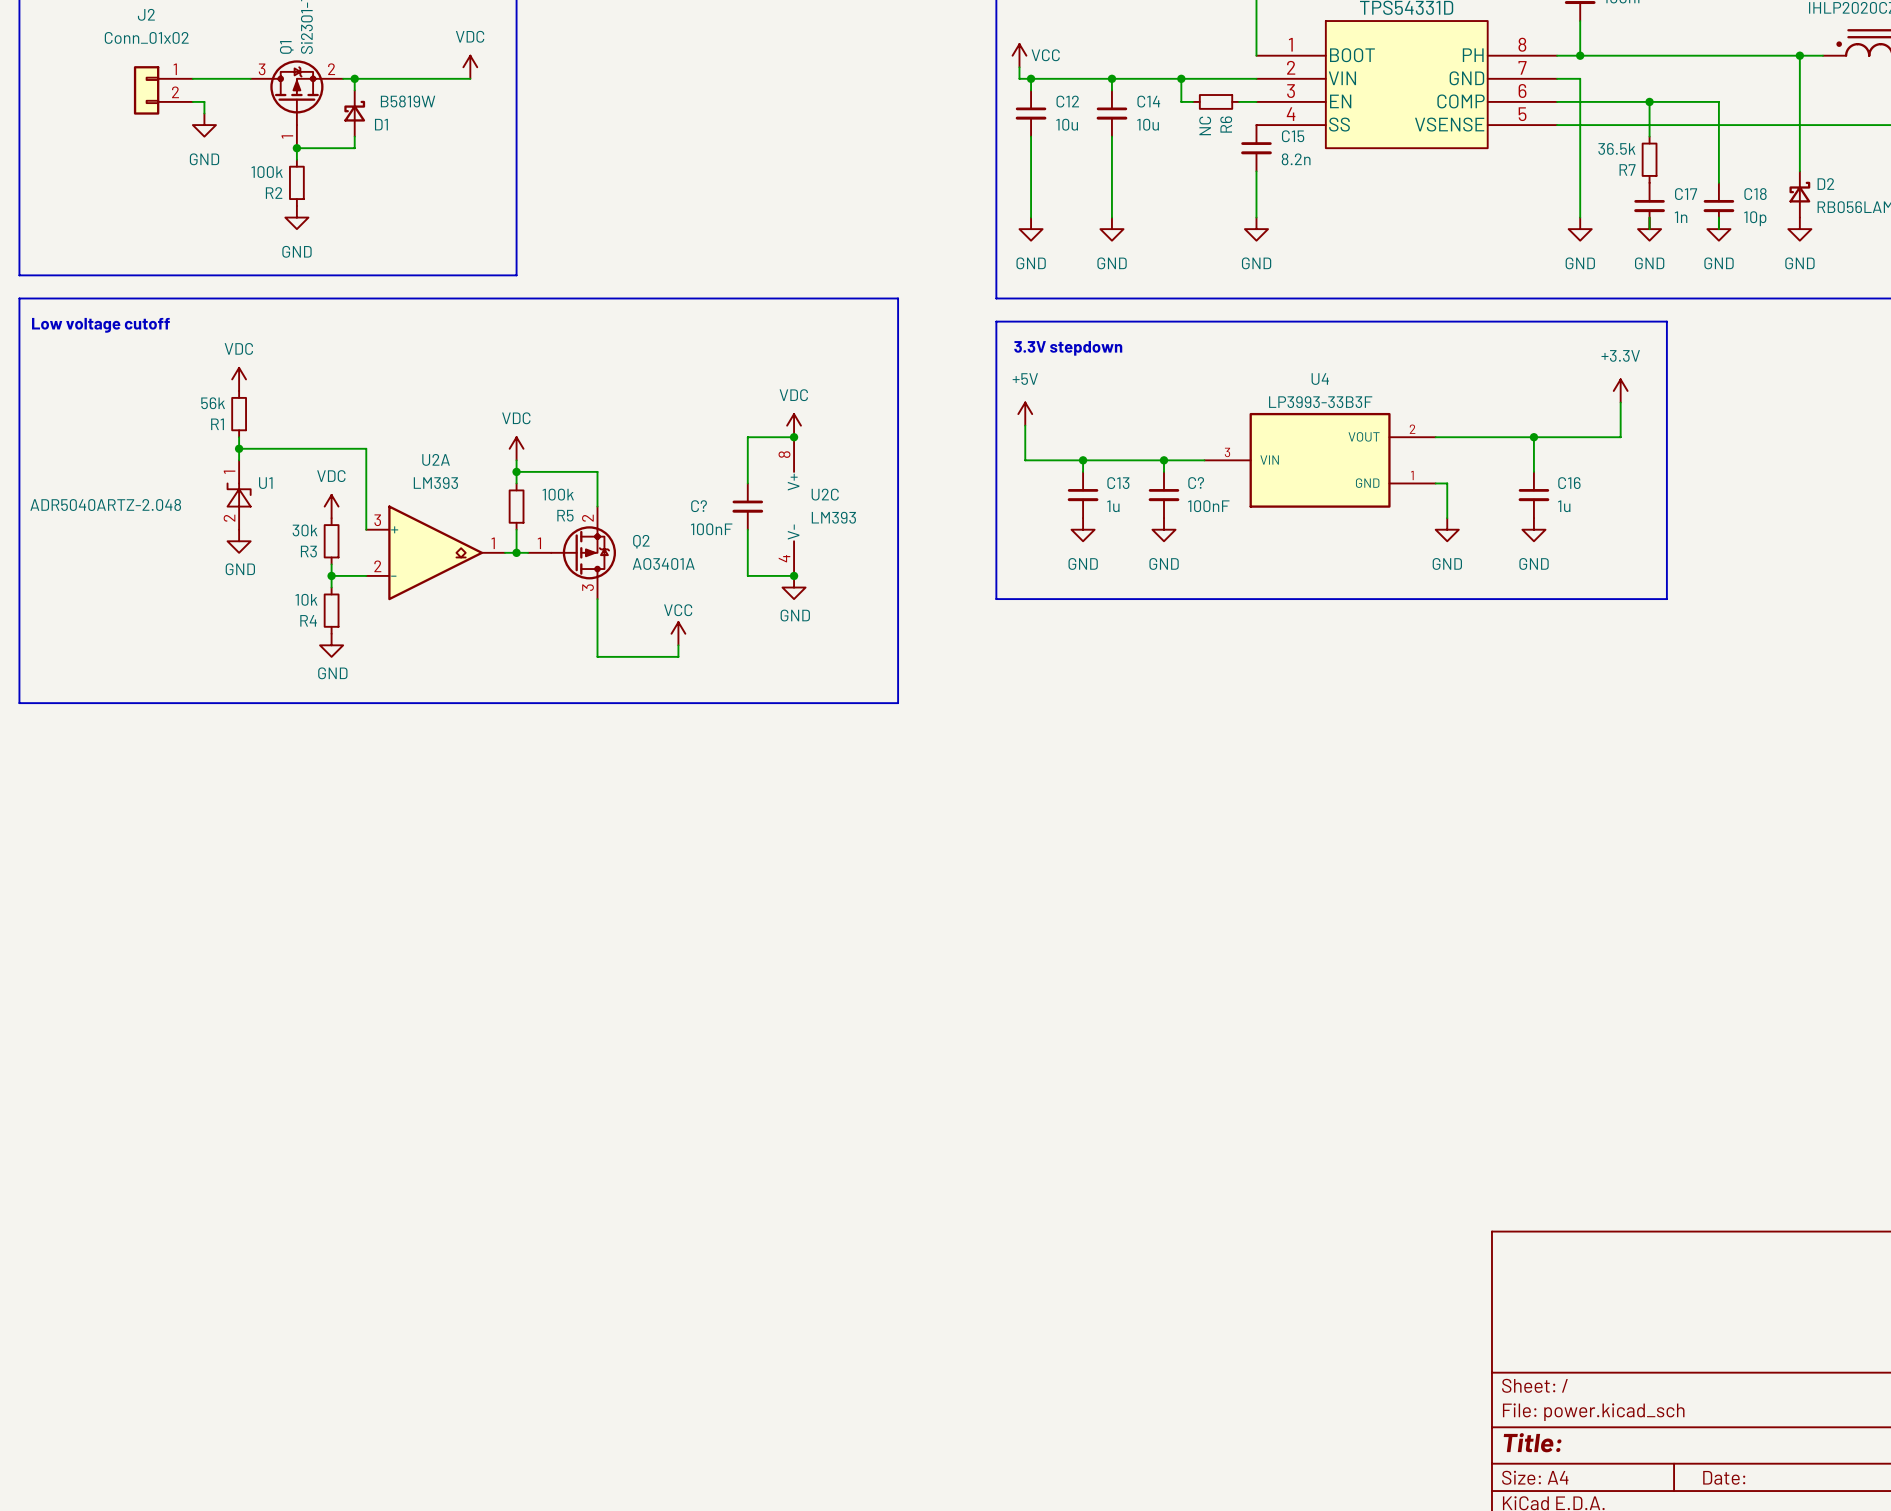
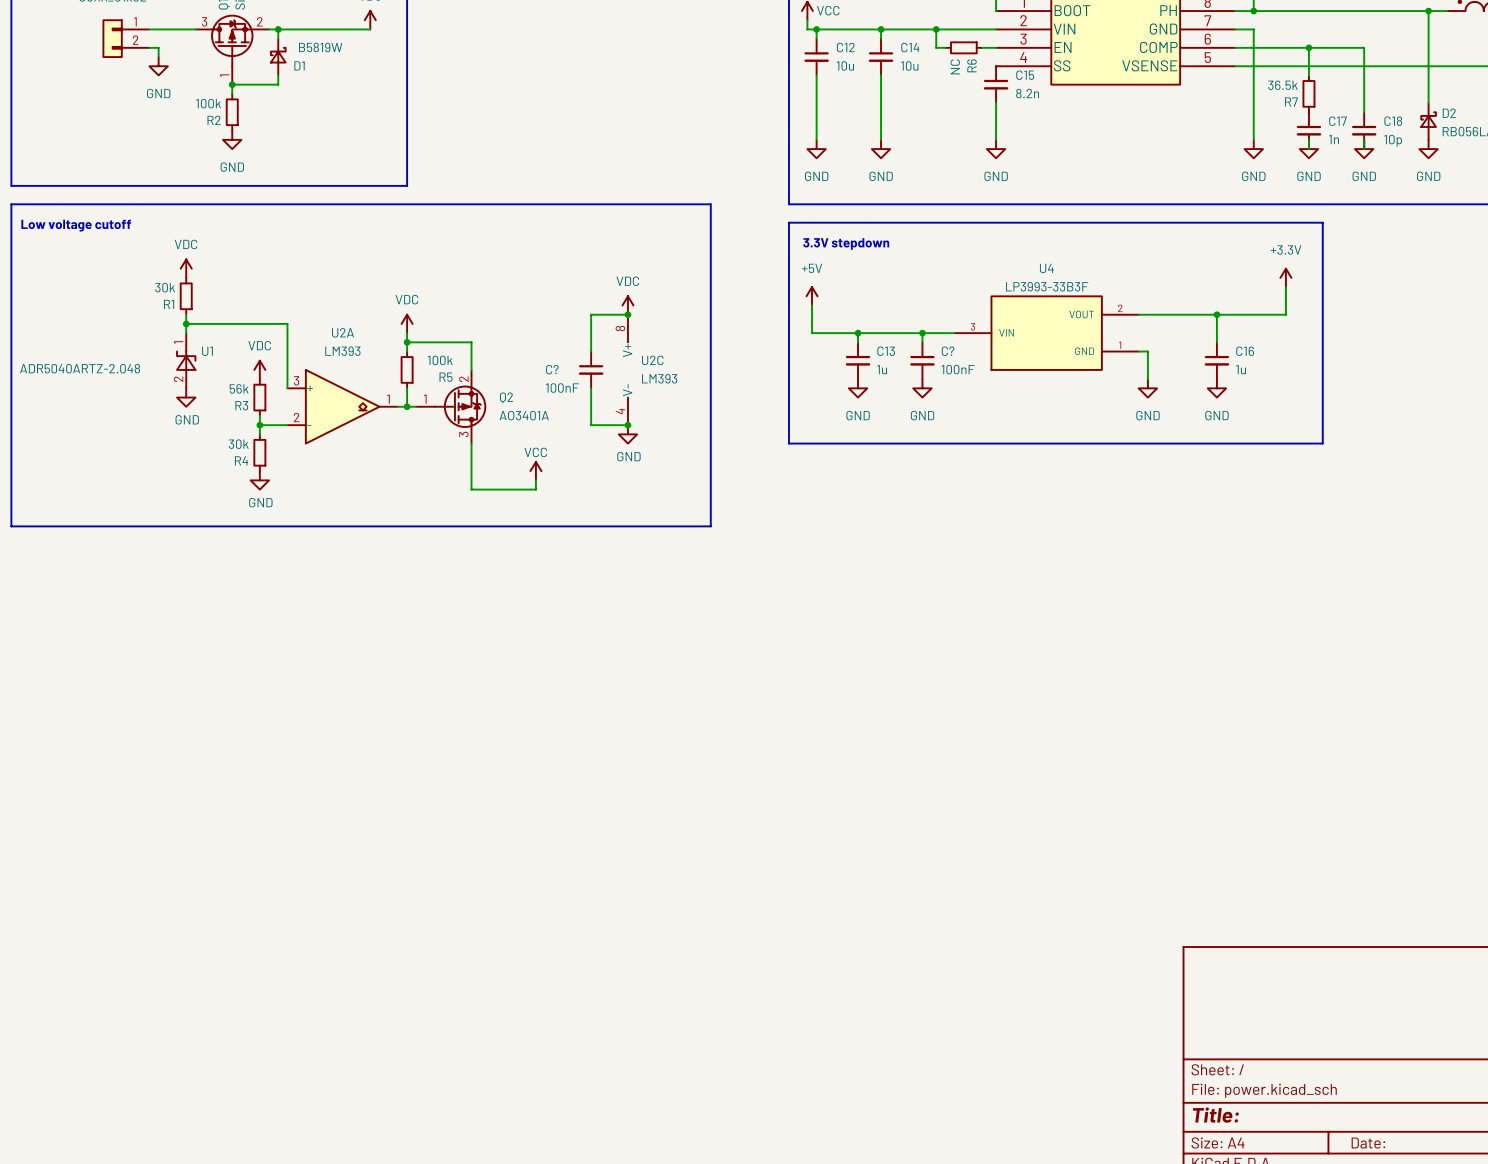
R1 value: 56k (213, 403) -> 30k (165, 287)
R3 value: 30k (305, 530) -> 56k (239, 388)
R4 value: 10k (306, 599) -> 30k (238, 444)

